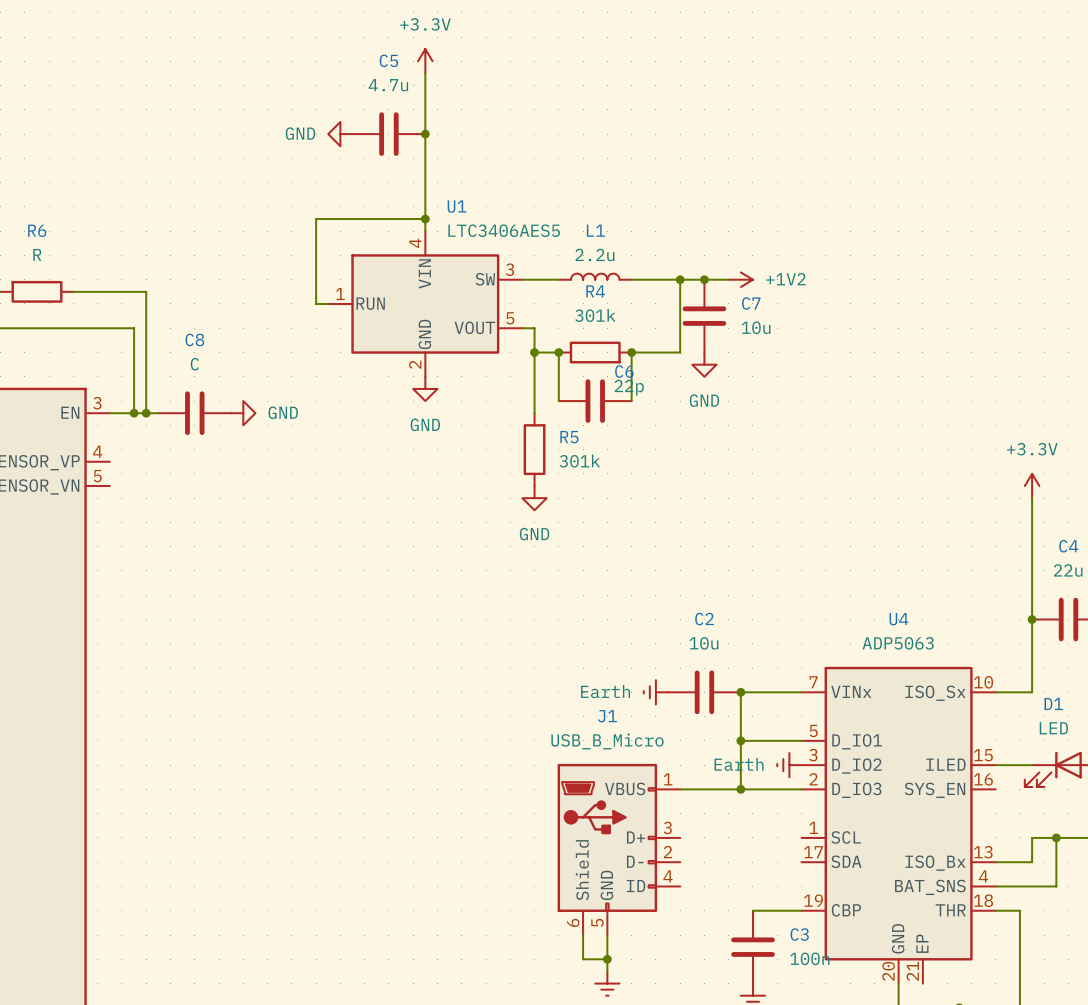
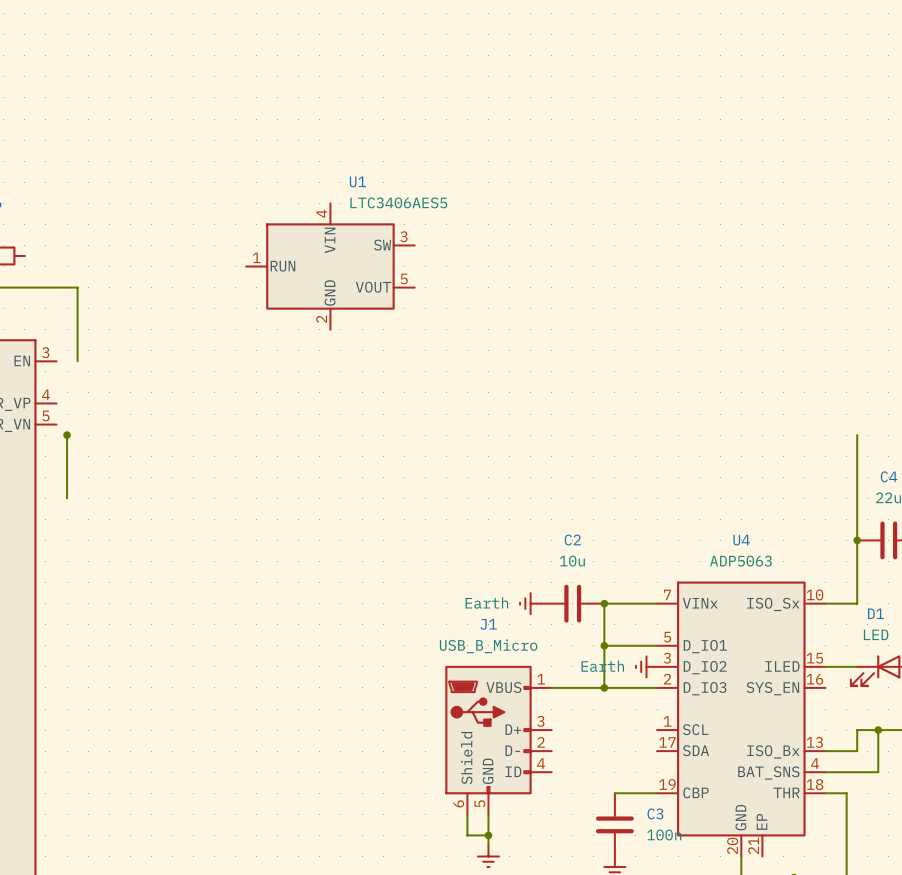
power symbol: +3.3V (425, 61) -> none
wire: (425, 73) (425, 231) -> none
power symbol: GND (340, 134) -> none
C5: 4.7u (388, 134) -> none
junction: (425, 134) -> none
wire: (425, 219) (316, 219) (316, 303) (328, 303) -> none
junction: (425, 219) -> none
L1: 2.2u (595, 276) -> none
wire: (522, 279) (558, 279) -> none
wire: (631, 279) (728, 279) -> none
wire: (680, 279) (680, 352) (631, 352) (631, 401) -> none
junction: (680, 279) -> none
junction: (704, 279) -> none
power symbol: +1V2 (740, 279) -> none
wire: (73, 291) (146, 291) (146, 413) -> none
C7: 10u (704, 316) -> none
wire: (522, 328) (534, 328) (534, 413) -> none
wire: (534, 352) (558, 352) (558, 401) -> none
junction: (534, 352) -> none
junction: (558, 352) -> none
R4: 301k (595, 352) -> none
junction: (631, 352) -> none
power symbol: GND (704, 364) -> none
power symbol: GND (425, 388) -> none
C6: 22p (595, 401) -> none
wire: (109, 413) (158, 413) -> none
junction: (134, 413) -> none
junction: (146, 413) -> none
C8: C (194, 413) -> none
power symbol: GND (243, 413) -> none
R5: 301k (534, 449) -> none
power symbol: +3.3V (1032, 486) -> none
wire: none -> (67, 435) (67, 498)
junction: none -> (67, 435)
power symbol: GND (534, 498) -> none

